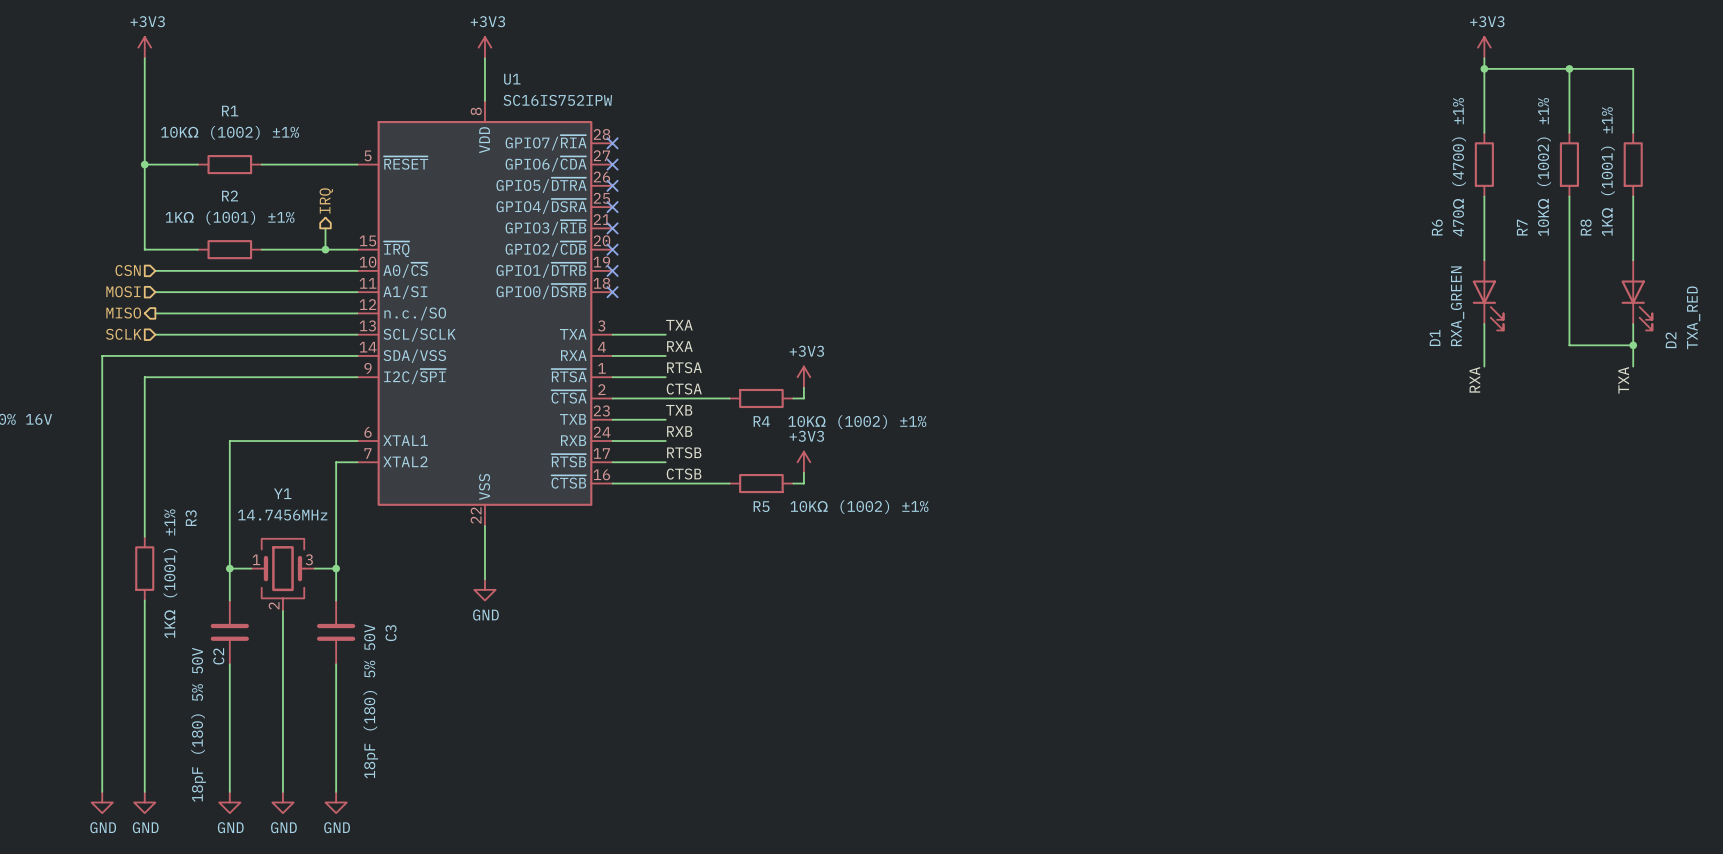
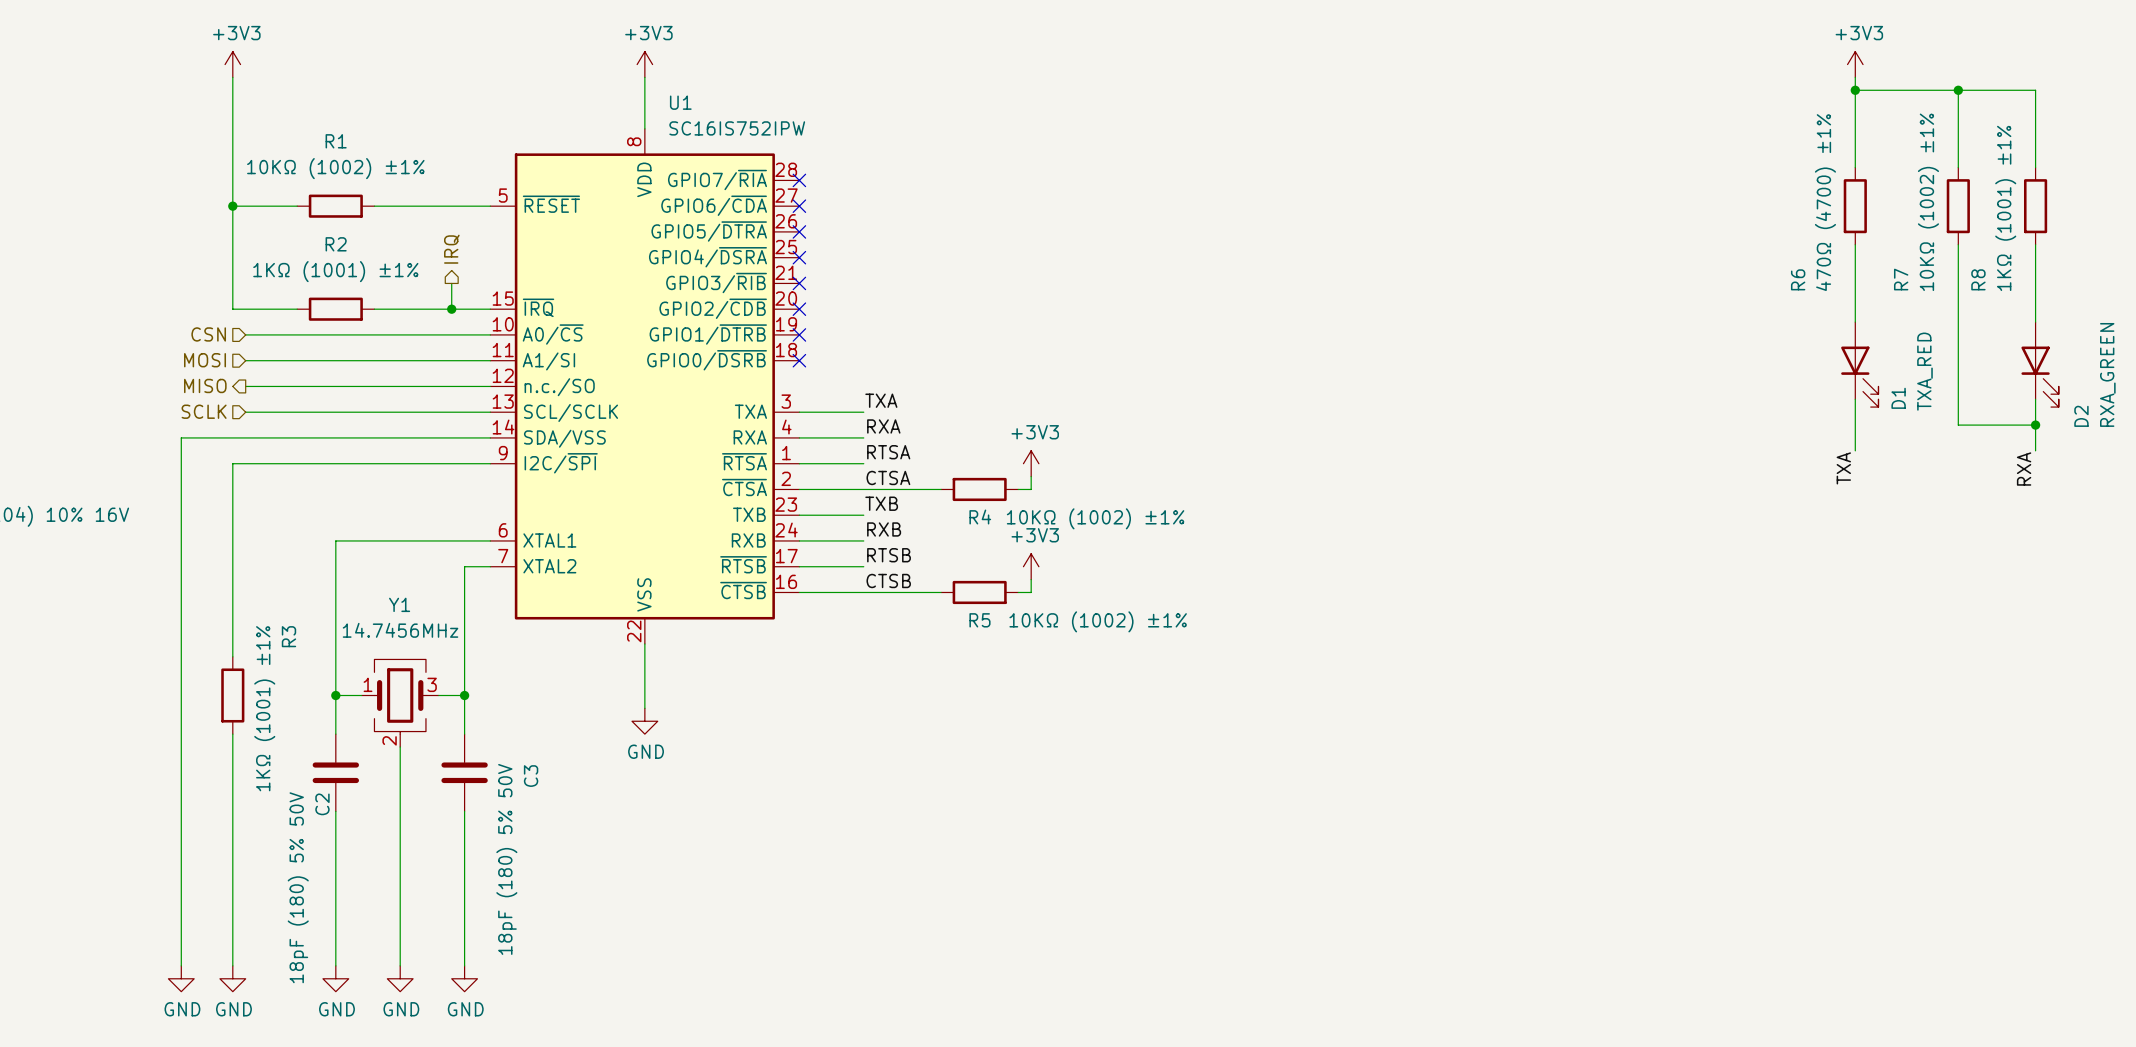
D1 value: RXA_GREEN (1457, 306) -> TXA_RED (1924, 371)
D2 value: TXA_RED (1693, 317) -> RXA_GREEN (2107, 374)
D1 name position: D1 (1435, 337) -> D1 (1898, 398)
label: RXA (1474, 379) -> TXA (1843, 468)
label: TXA (1623, 380) -> RXA (2024, 469)

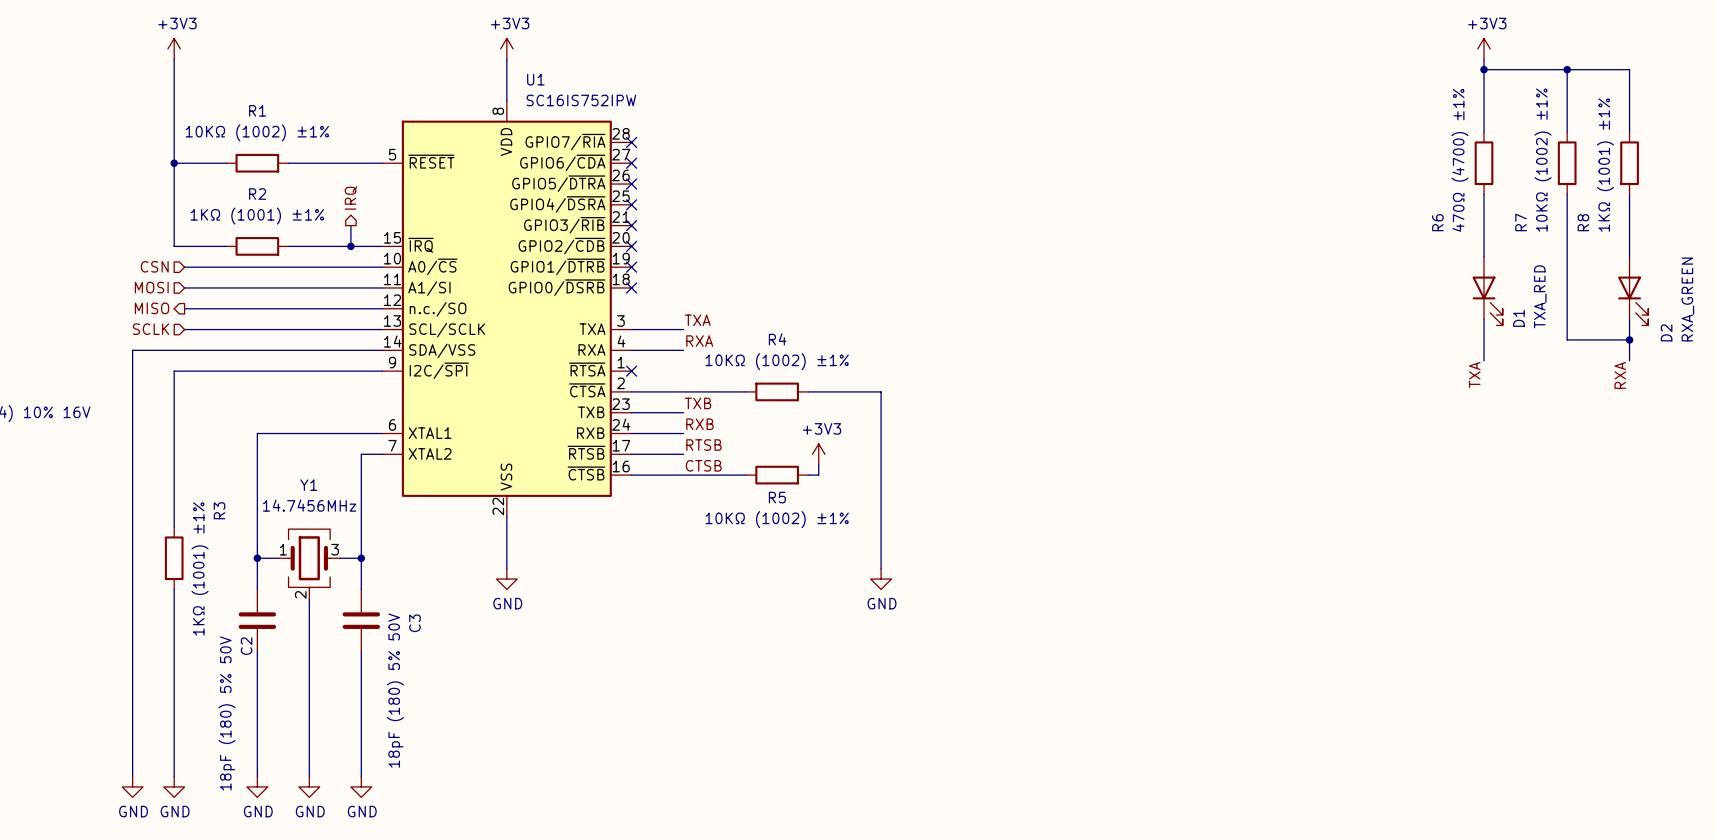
label: RTSA (888, 452) -> none
wire: (799, 463) (863, 463) -> none
no-connect mark: none -> (631, 371)
power symbol: +3V3 (1031, 463) -> none
wire: (1031, 476) (1031, 489) -> (881, 568) (881, 391) (818, 391)
label: CTSA (888, 477) -> none
R4 name position: R4 (980, 517) -> R4 (777, 339)
R4 value position: 10KΩ (1002) ±1% (1095, 518) -> 10KΩ (1002) ±1% (777, 361)
R5 value position: 10KΩ (1002) ±1% (1098, 621) -> 10KΩ (1002) ±1% (777, 519)
power symbol: none -> GND (881, 579)

